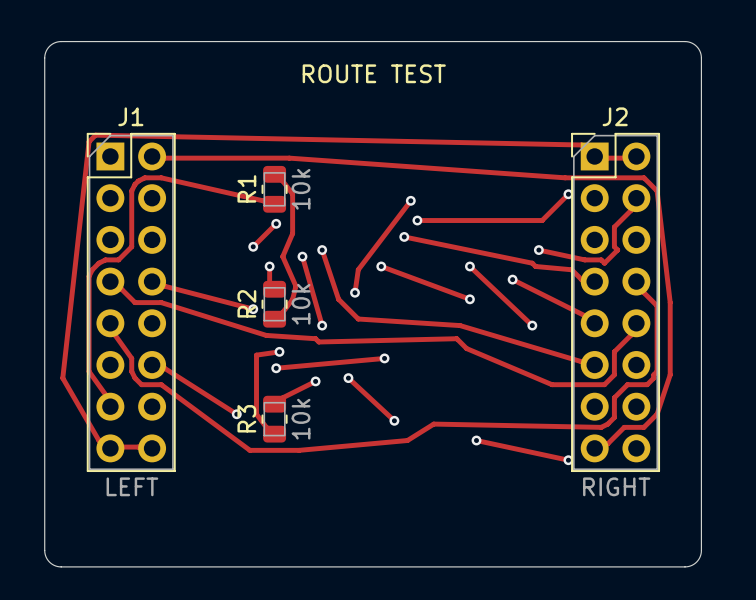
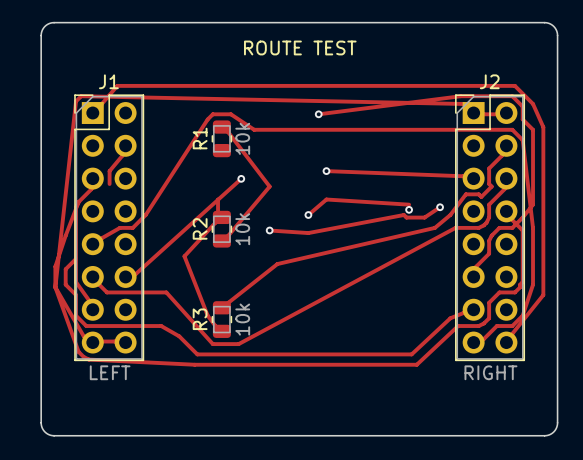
track: none -> (92, 113) (117, 85) (514, 85) (533, 103) (543, 127) (543, 295) (506, 342)
track: (152, 156) (263, 158) -> (132, 227) (145, 215) (212, 114)
track: (286, 158) (565, 177) -> (230, 114) (254, 129) (450, 129)
via: none -> (318, 114)
track: (282, 181) (292, 194) (292, 233) (282, 256) (295, 286) (292, 299) (282, 312) -> (228, 132) (269, 186) (228, 235)
track: (568, 194) (542, 220) (417, 220) -> none
via: (568, 194) -> none
track: (410, 200) (358, 269) (355, 292) -> none
via: (410, 200) -> none
track: (274, 204) (161, 177) (144, 177) (135, 184) (131, 190) (131, 230) -> (125, 145) (122, 155) (109, 171)
via: (417, 220) -> none
track: (276, 223) (253, 246) -> none
via: (276, 223) -> none
track: none -> (326, 171) (463, 176) (473, 178)
via: none -> (326, 171)
track: (404, 236) (532, 263) (535, 266) (571, 269) (581, 279) (594, 281) -> none
via: (404, 236) -> none
via: none -> (241, 178)
track: (131, 246) (118, 259) (105, 259) (98, 263) -> (92, 178) (91, 189) (83, 196)
via: (253, 246) -> none
track: (322, 250) (338, 299) (358, 319) (460, 325) (594, 364) -> (318, 114) (460, 96) (512, 96) (522, 106) (522, 119) (533, 129) (533, 204) (512, 227) (499, 227) (491, 235) (489, 240) (489, 253) (476, 266) (473, 276)
via: (322, 250) -> none
track: (538, 250) (584, 259) -> none
via: (538, 250) -> none
track: (302, 256) (322, 325) -> none
via: (302, 256) -> none
via: (269, 266) -> none
track: (381, 266) (469, 299) -> none
via: (381, 266) -> none
track: (469, 266) (532, 325) -> none
via: (469, 266) -> none
track: none -> (78, 202) (55, 266) (55, 287) (78, 351) (88, 359) (194, 364) (416, 364) (458, 326) (478, 326)
track: none -> (409, 204) (326, 199) (308, 215)
track: none -> (440, 207) (424, 217) (406, 217) (403, 215) (308, 233) (269, 230)
via: none -> (440, 207)
track: (512, 279) (584, 315) (594, 323) -> none
track: (110, 281) (135, 302) (144, 302) -> (92, 244) (119, 227)
track: (152, 281) (253, 309) -> none
via: none -> (308, 215)
via: (355, 292) -> none
via: (469, 299) -> none
track: (161, 302) (266, 335) (315, 338) (318, 342) (456, 338) (466, 348) (552, 384) (604, 384) (614, 374) (614, 351) (630, 335) (636, 323) -> none
via: none -> (269, 230)
via: (253, 309) -> none
track: (110, 323) (115, 335) (131, 358) (131, 371) (141, 384) -> (92, 276) (107, 292) (117, 292)
via: (322, 325) -> none
via: (532, 325) -> none
track: none -> (76, 258) (65, 269) (65, 284) (76, 295) (76, 315) (86, 326) (161, 326) (179, 336) (197, 354) (411, 354) (450, 318) (473, 309)
track: (279, 351) (256, 355) (256, 414) -> (221, 217) (184, 256) (207, 315)
via: (279, 351) -> none
track: (384, 358) (276, 368) -> none
via: (384, 358) -> none
track: (152, 364) (164, 368) (236, 414) -> (125, 276) (135, 274) (241, 178)
via: (276, 368) -> none
track: (348, 378) (394, 420) -> none
via: (348, 378) -> none
track: (315, 381) (282, 397) -> (465, 194) (450, 215) (434, 227) (277, 264) (228, 302)
via: (315, 381) -> none
track: (161, 384) (249, 450) (263, 450) -> (132, 292) (166, 292) (212, 344)
via: (236, 414) -> none
via: (394, 420) -> none
track: (601, 427) (433, 424) (407, 440) (295, 450) -> (506, 178) (504, 189) (489, 204) (489, 217) (483, 225) (478, 227) (455, 227) (238, 344)
track: (476, 440) (568, 460) -> none
via: (476, 440) -> none
via: (568, 460) -> none

